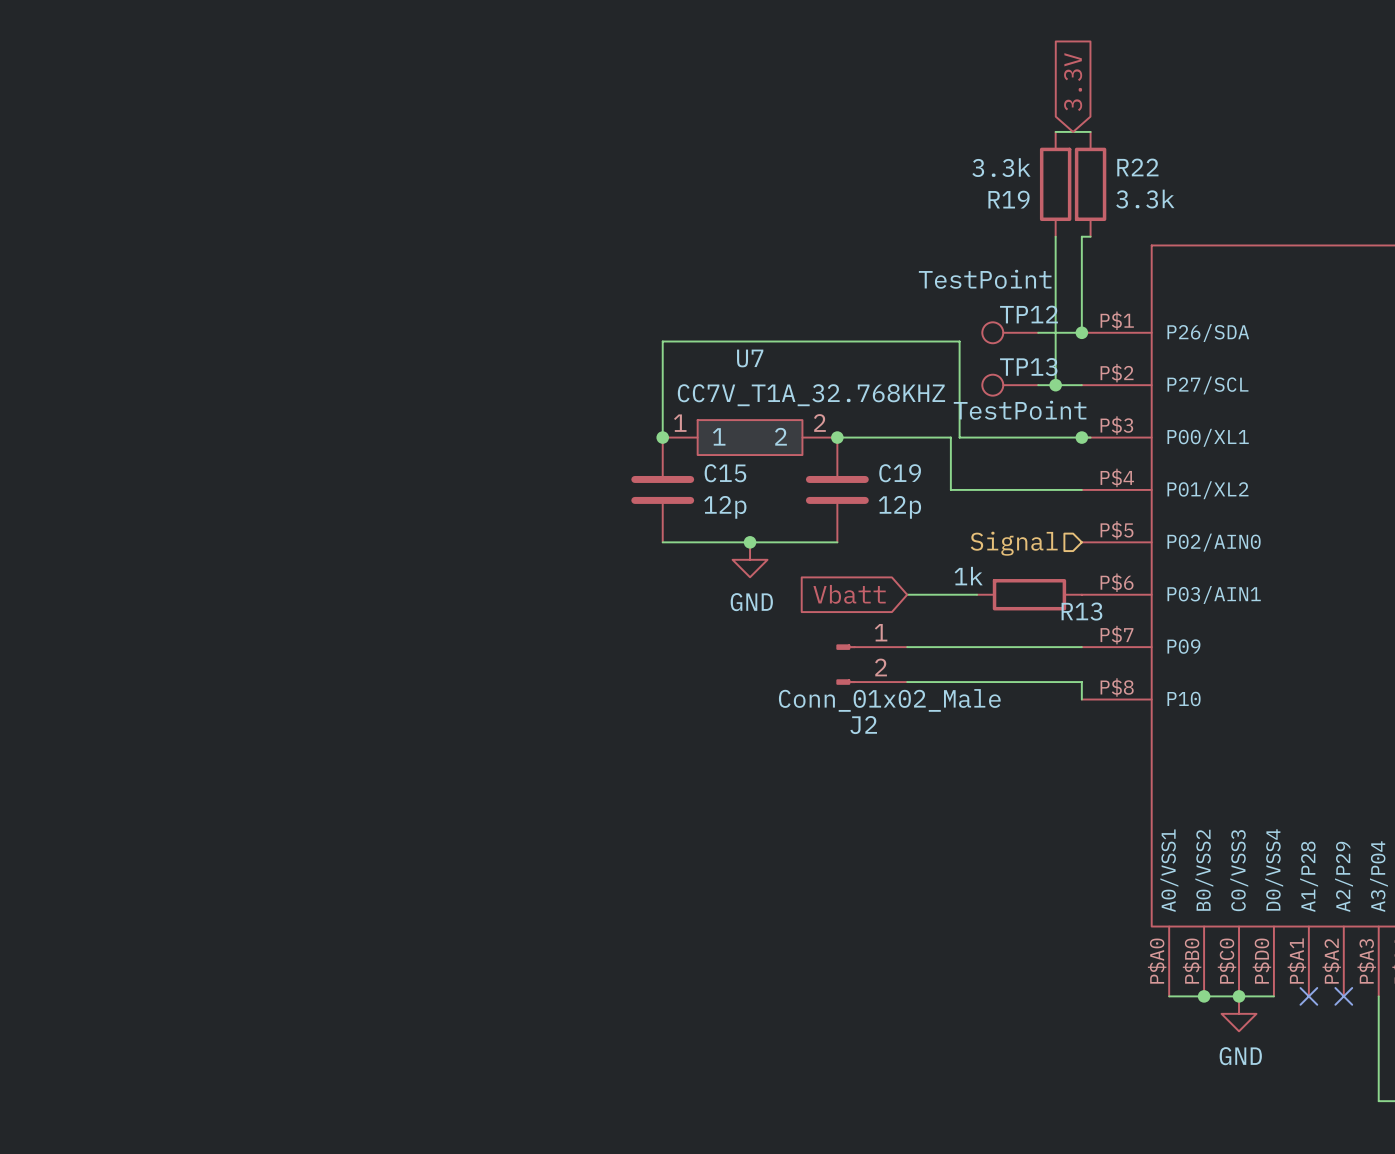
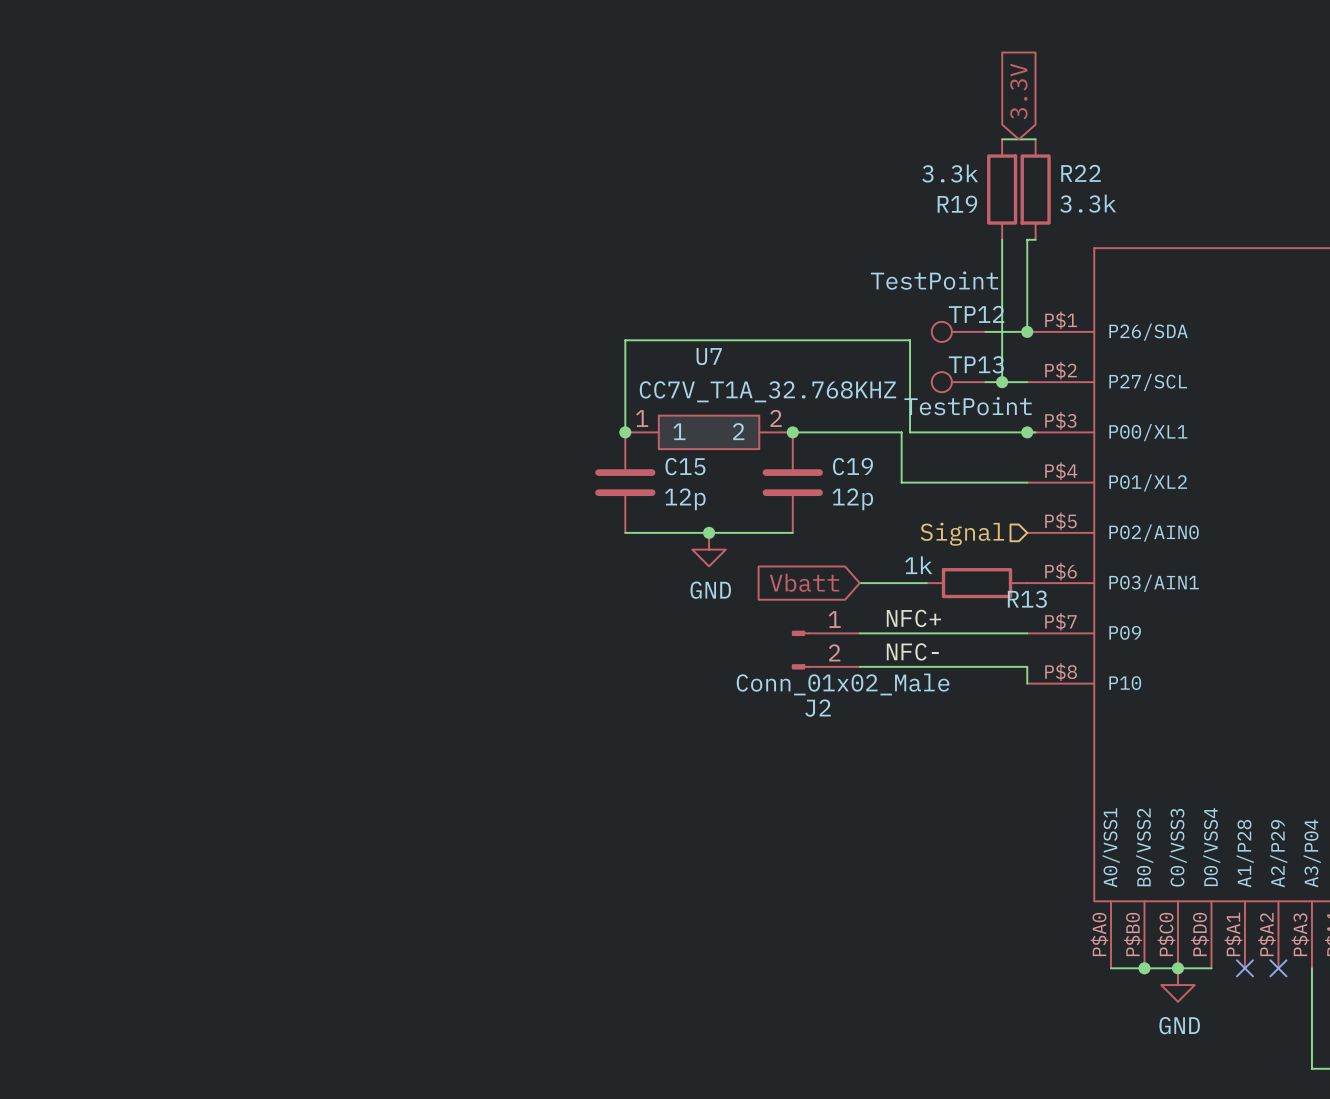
label: none -> NFC+ (913, 618)
label: none -> NFC- (912, 651)

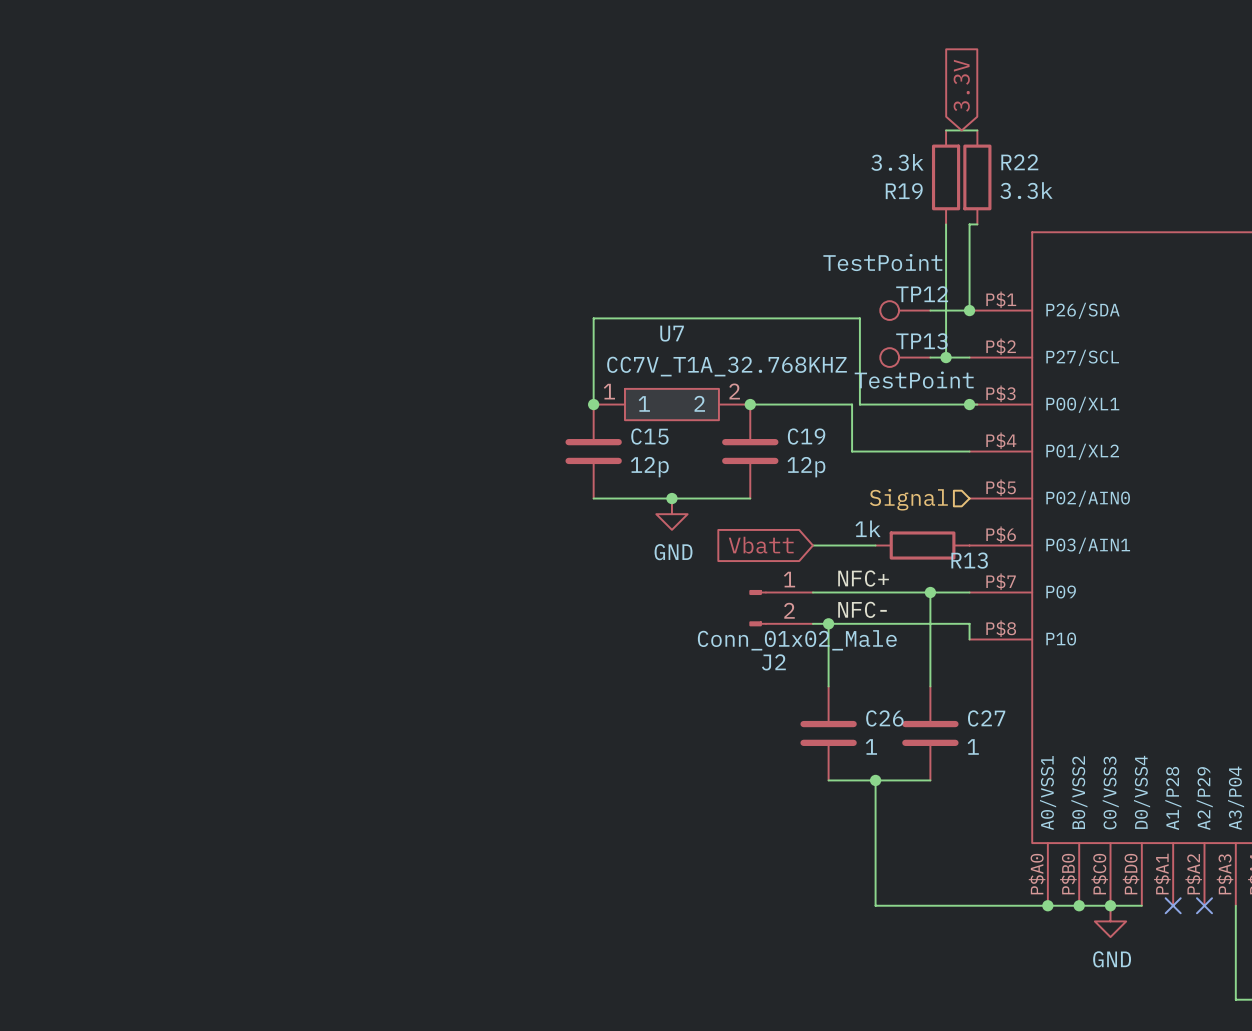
wire: none -> (930, 592) (930, 686)
junction: none -> (930, 592)
wire: none -> (828, 623) (828, 686)
junction: none -> (828, 623)
C26: none -> 1 (828, 733)
C27: none -> 1 (930, 733)
wire: none -> (828, 780) (930, 780)
wire: none -> (875, 780) (875, 905) (1047, 905)
junction: none -> (875, 780)
junction: none -> (1047, 905)

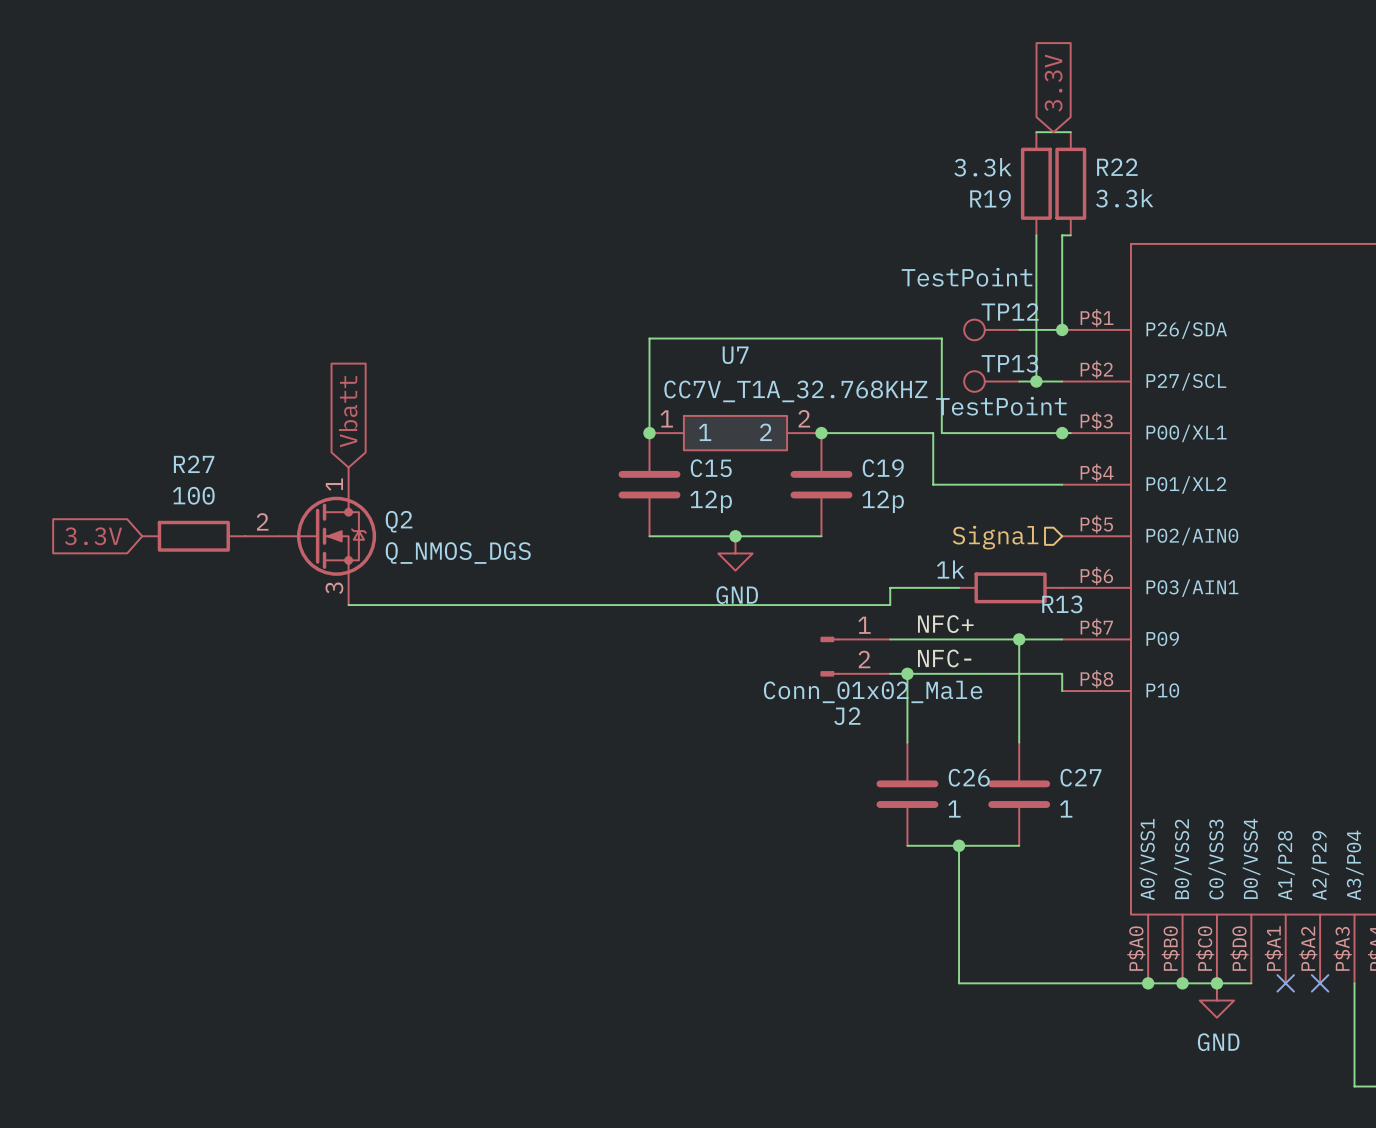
global label: none -> Vbatt (348, 411)
global label: none -> 3.3V (93, 536)
R27: none -> 100 (193, 536)
Q2: none -> Q_NMOS_DGS (310, 536)
global label: Vbatt (761, 545) -> none
wire: none -> (890, 587) (890, 605) (348, 605)

